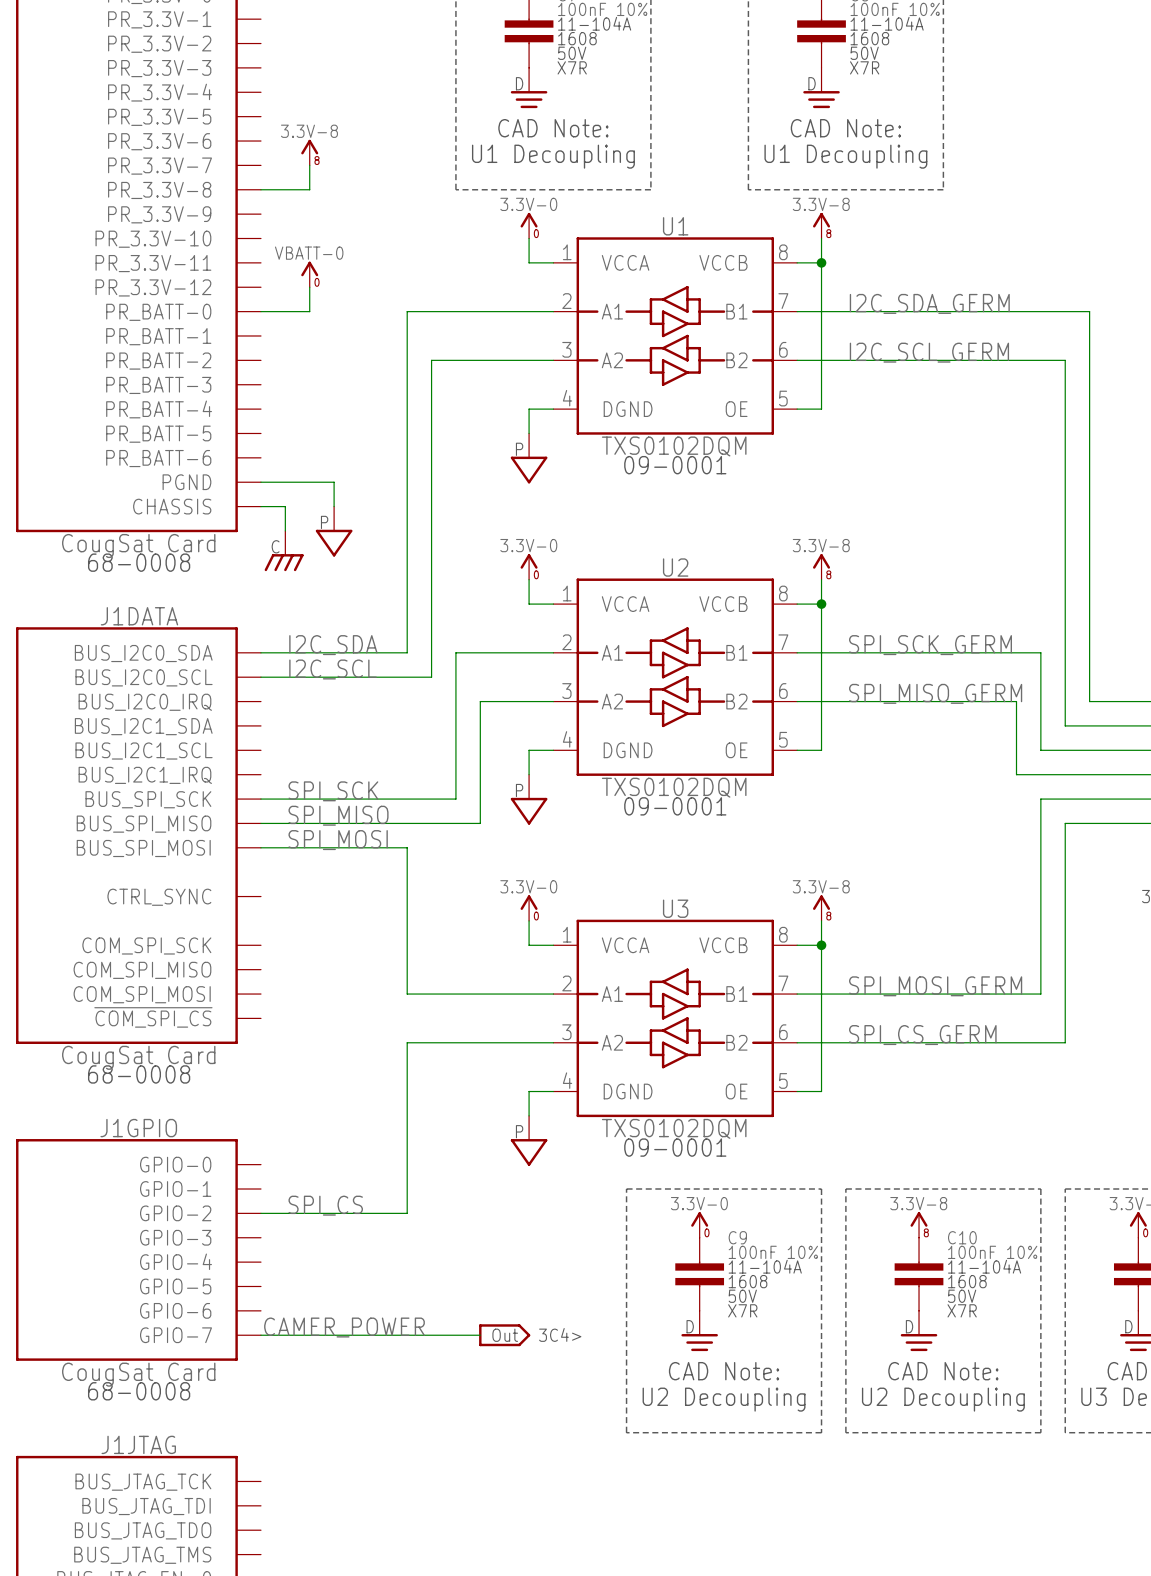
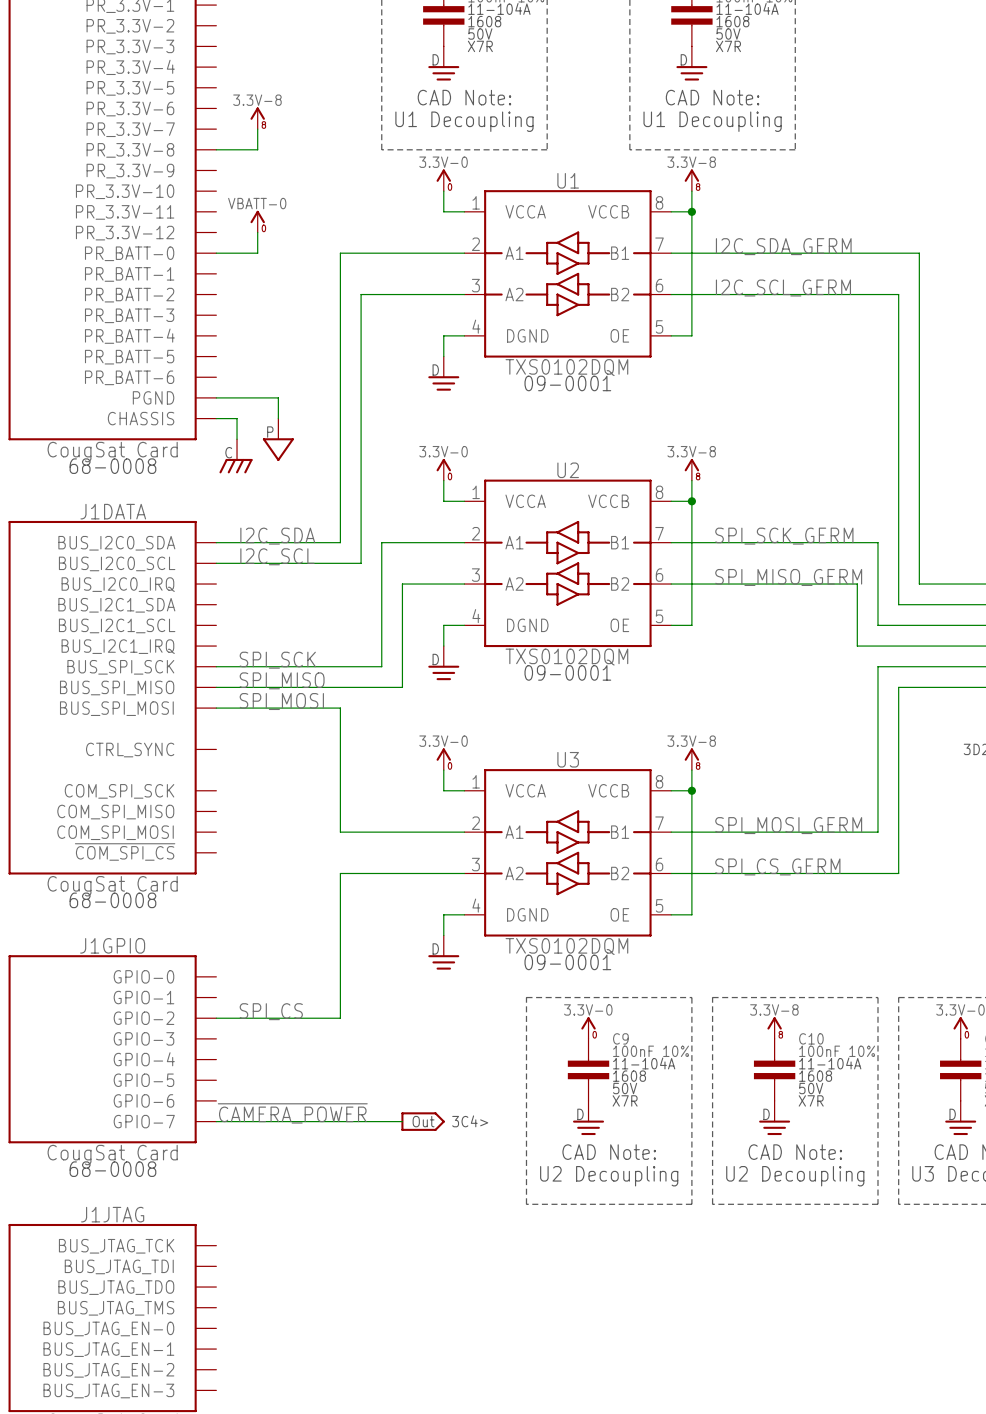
power symbol shape: [510, 433, 548, 484] -> [428, 356, 460, 391]
power symbol shape: [510, 774, 548, 825] -> [428, 646, 460, 681]
power symbol shape: [510, 1115, 548, 1166] -> [428, 935, 460, 970]
label: CAMER_POWER (344, 1327) -> ~{CAMERA_POWER} (292, 1113)

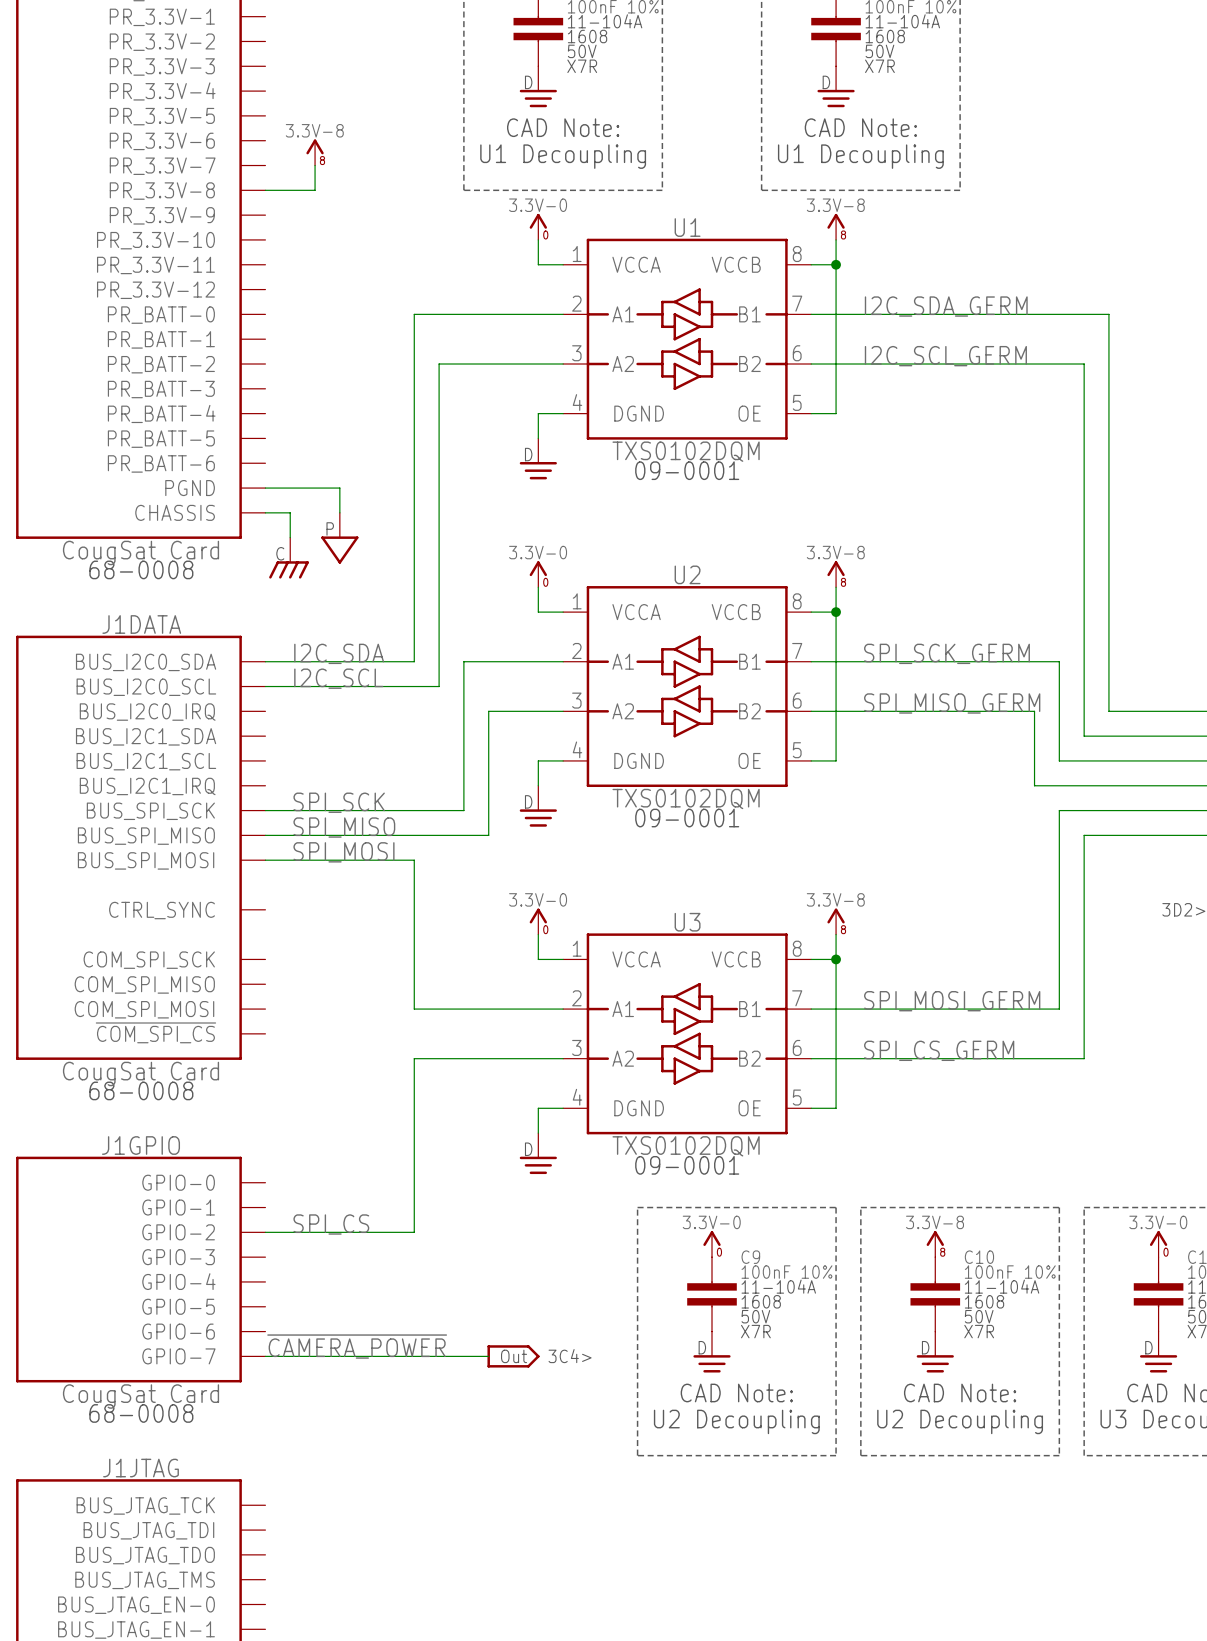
power symbol: VBATT-0 (257, 221) -> none
wire: (257, 232) (257, 253) (216, 253) -> none

